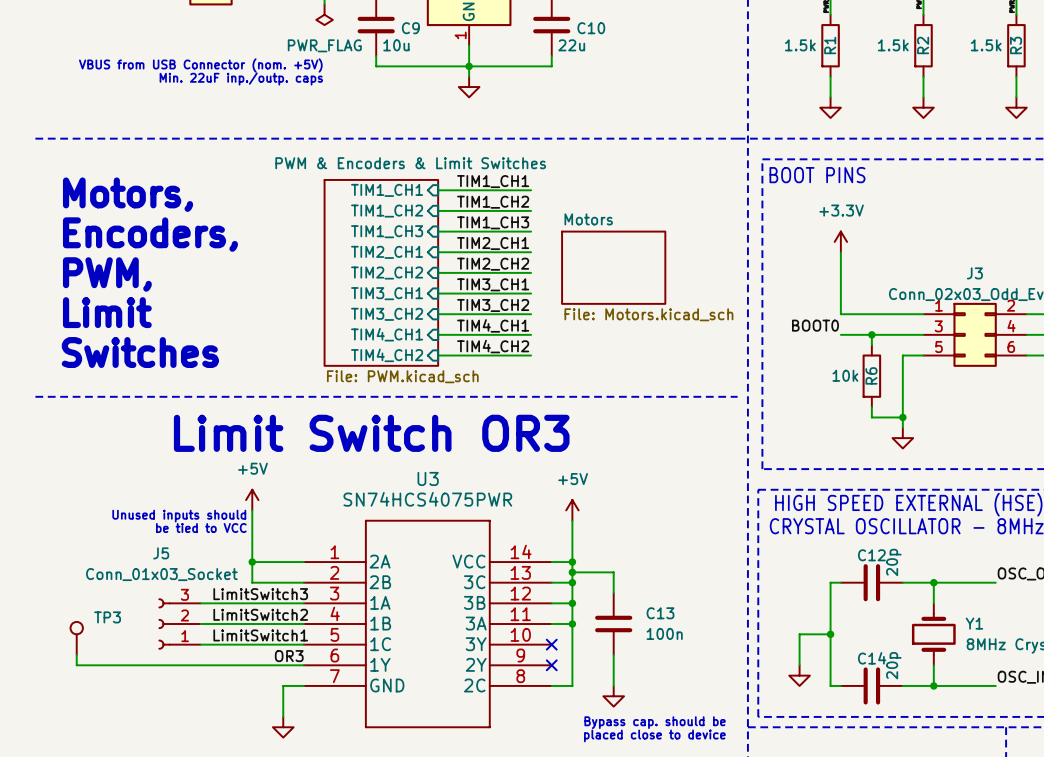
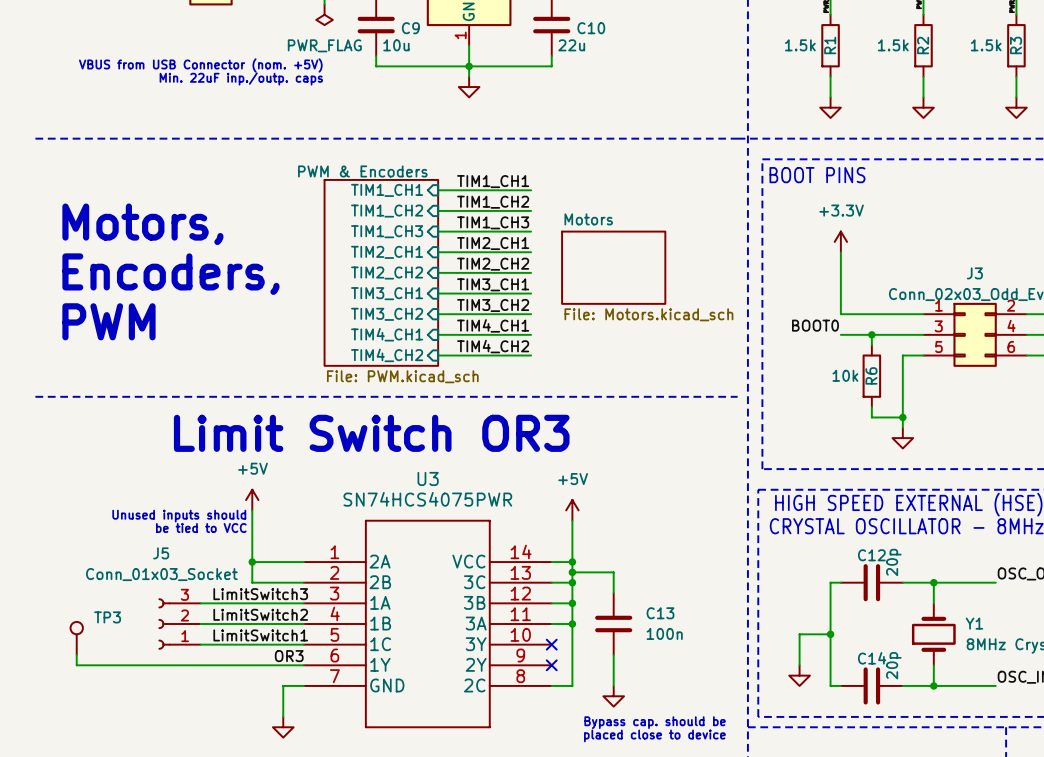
sheet PWM & Encoders name: PWM & Encoders & Limit Switches (410, 163) -> PWM & Encoders (362, 171)
text: Motors, (128, 194) -> none
text: Encoders, (150, 234) -> Motors, (142, 224)
text: PWM, (107, 274) -> Encoders, (170, 274)
text: Limit (107, 312) -> none
text: none -> PWM (108, 321)
text: Switches (140, 352) -> none

